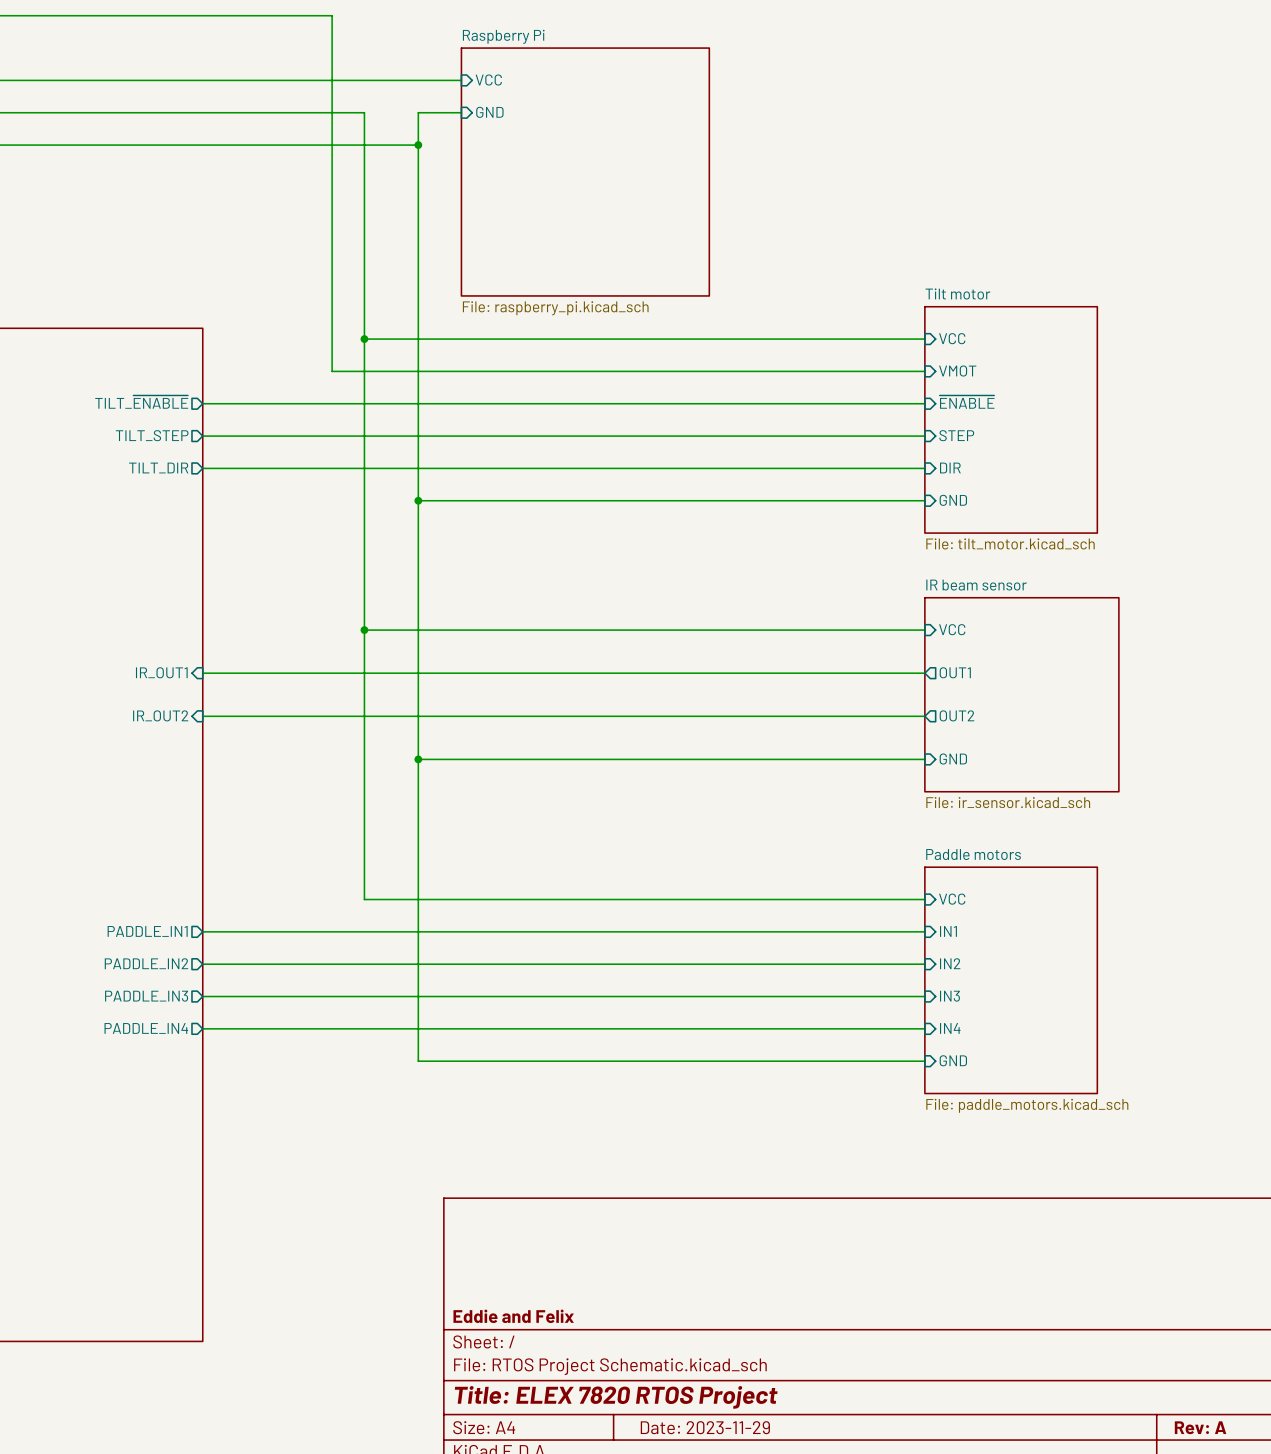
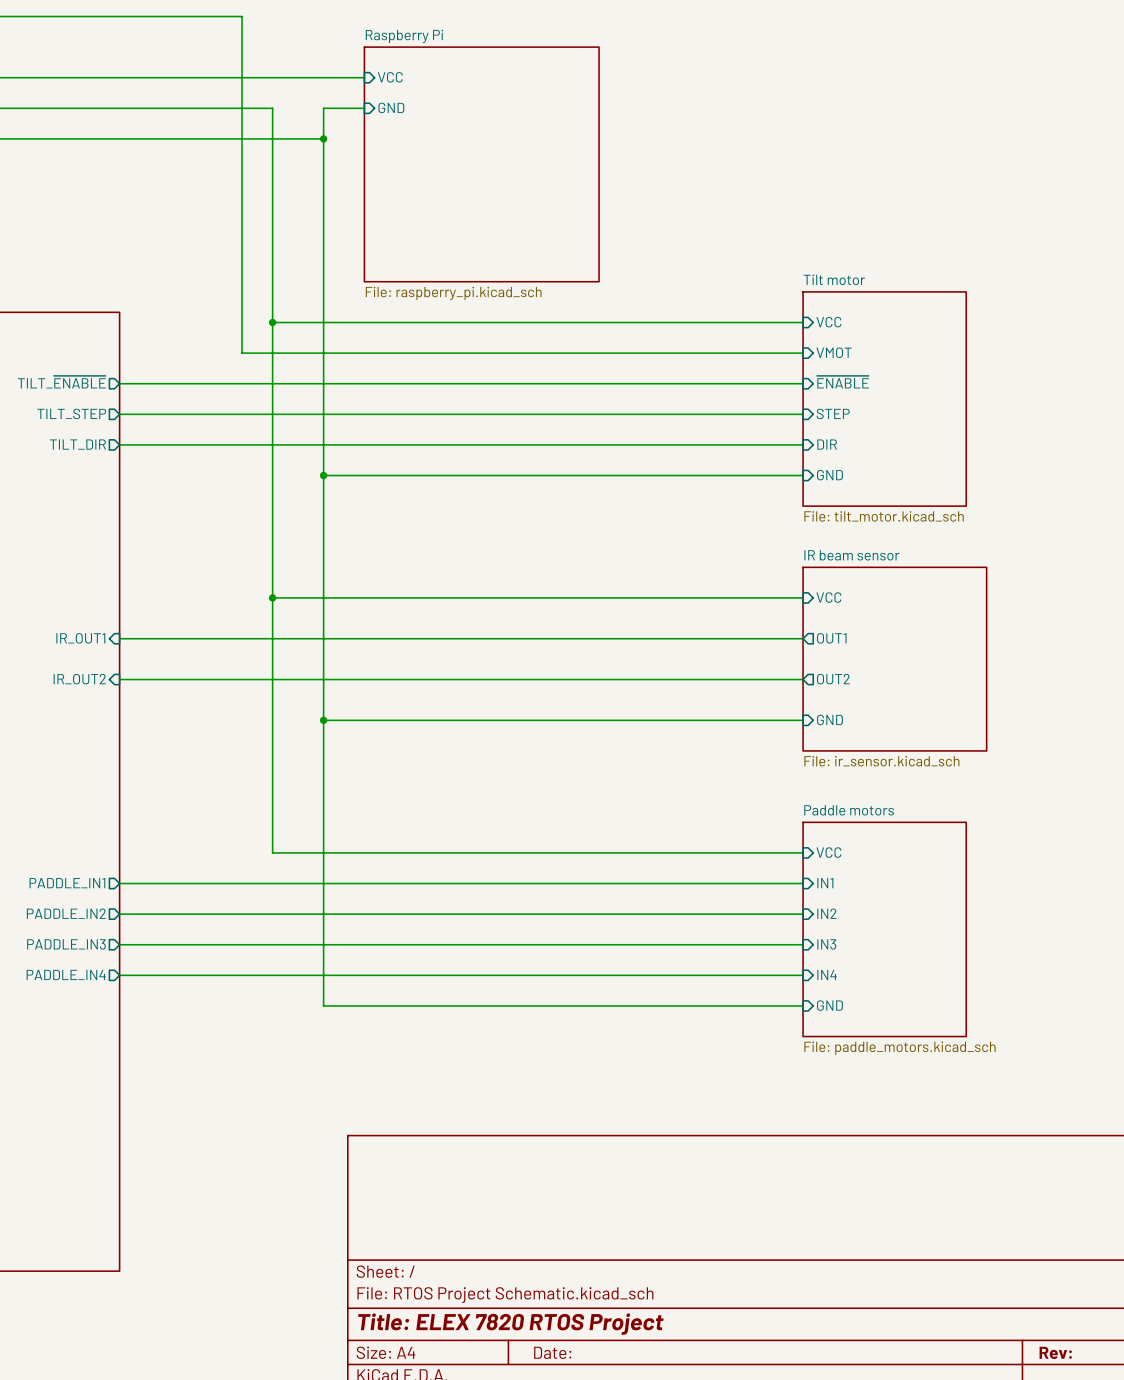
title block: Eddie and Felix (513, 1316) -> none
title block: Date: 2023-11-29 (705, 1427) -> Date: (552, 1352)
title block: Rev: A (1200, 1427) -> Rev: (1055, 1352)

